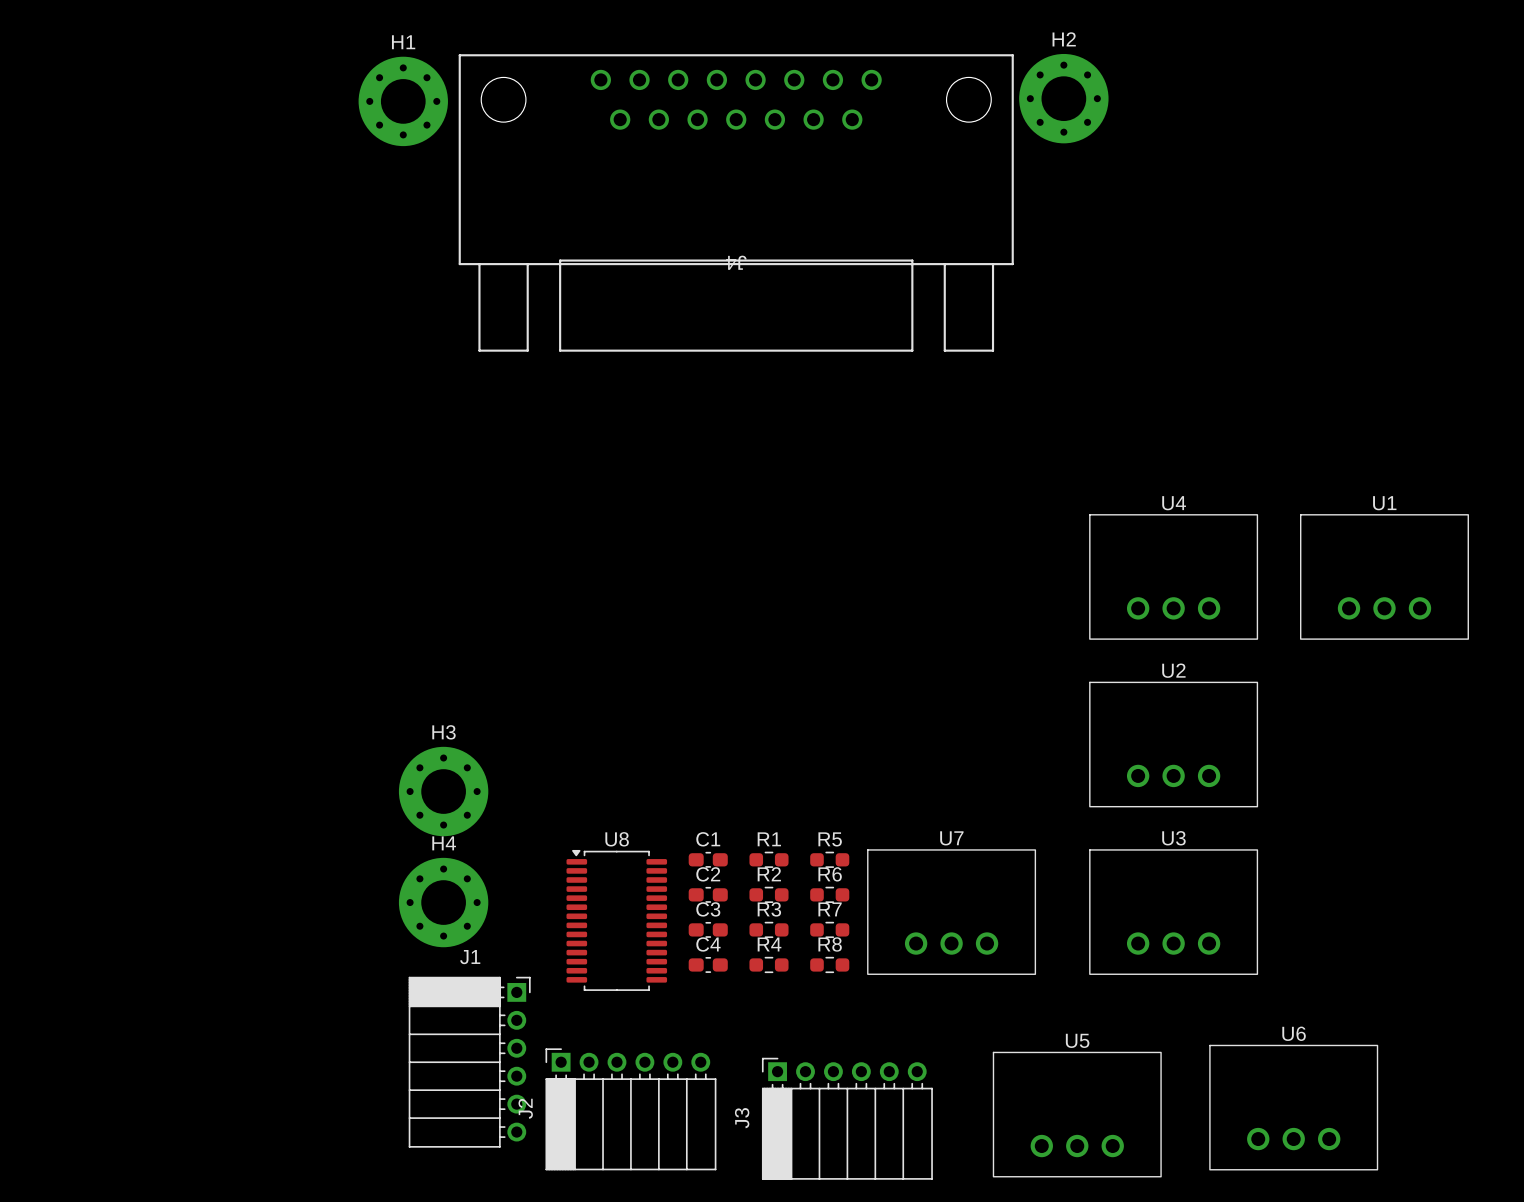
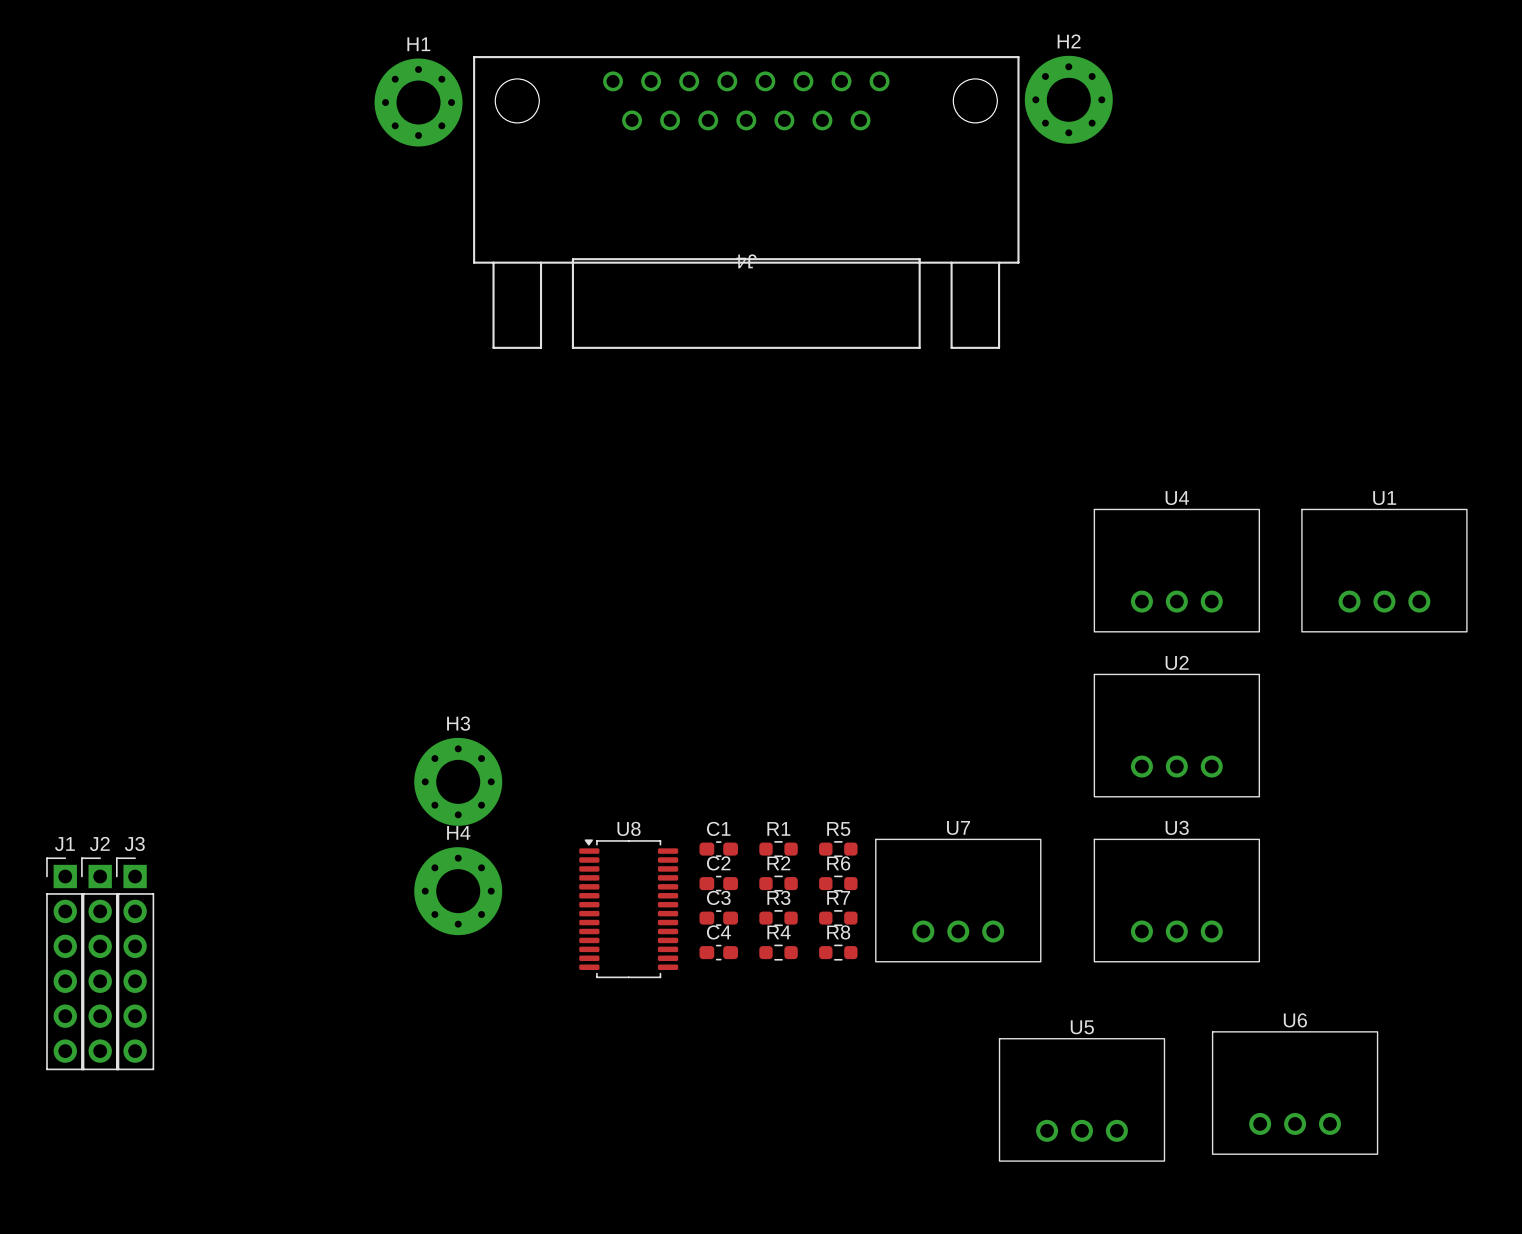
J1 footprint: [408, 976, 531, 1148] -> [46, 857, 85, 1071]
J2 footprint: [545, 1048, 717, 1171] -> [81, 857, 120, 1071]
J3 footprint: [761, 1057, 933, 1180] -> [116, 857, 155, 1071]
J2 name position: J2 (525, 1108) -> J2 (99, 843)
J3 name position: J3 (742, 1118) -> J3 (134, 843)

